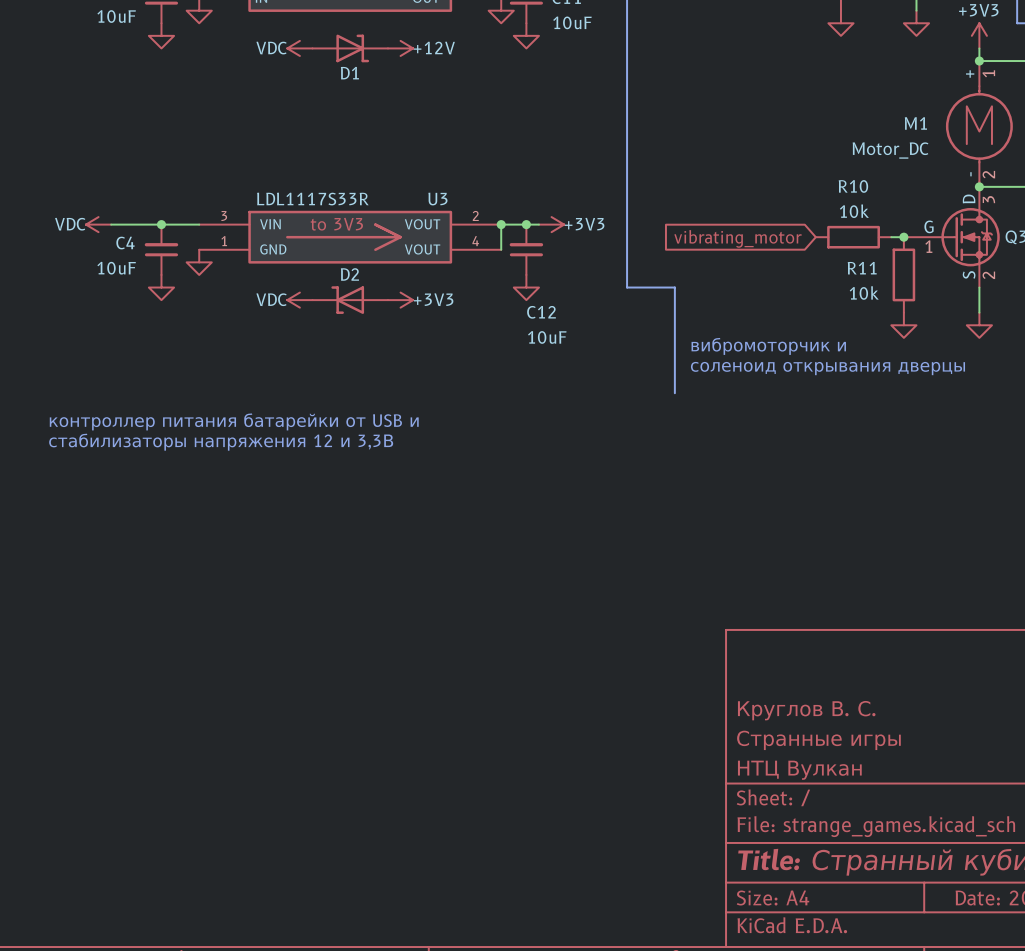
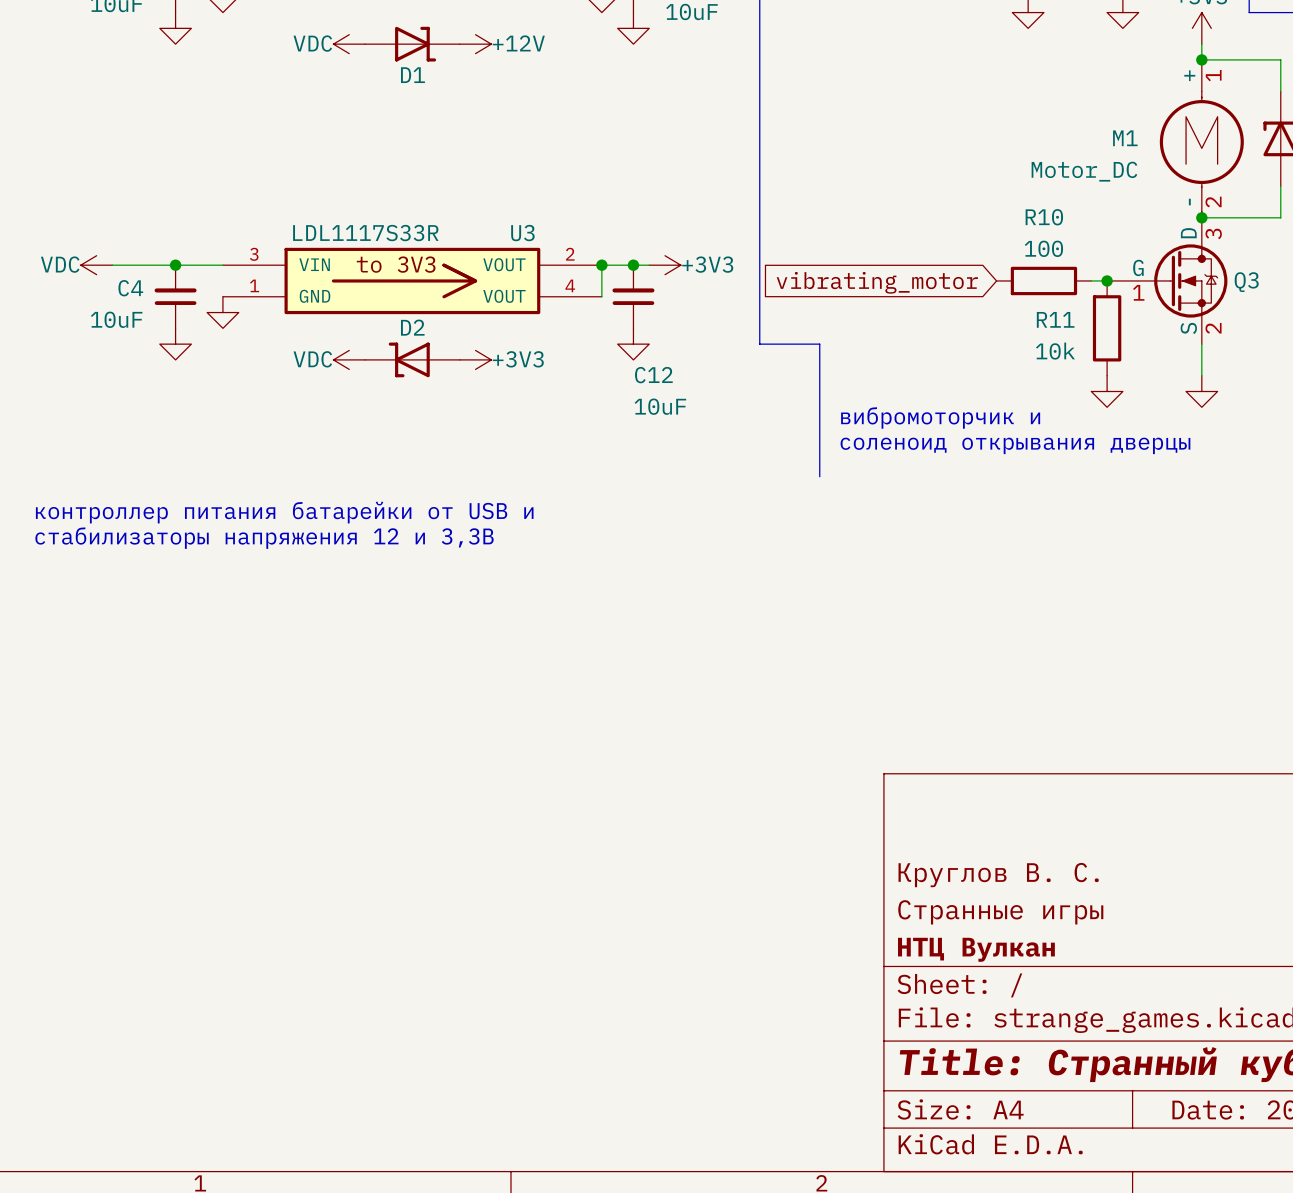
R10 text: 10k (854, 211) -> 100 (1043, 248)

